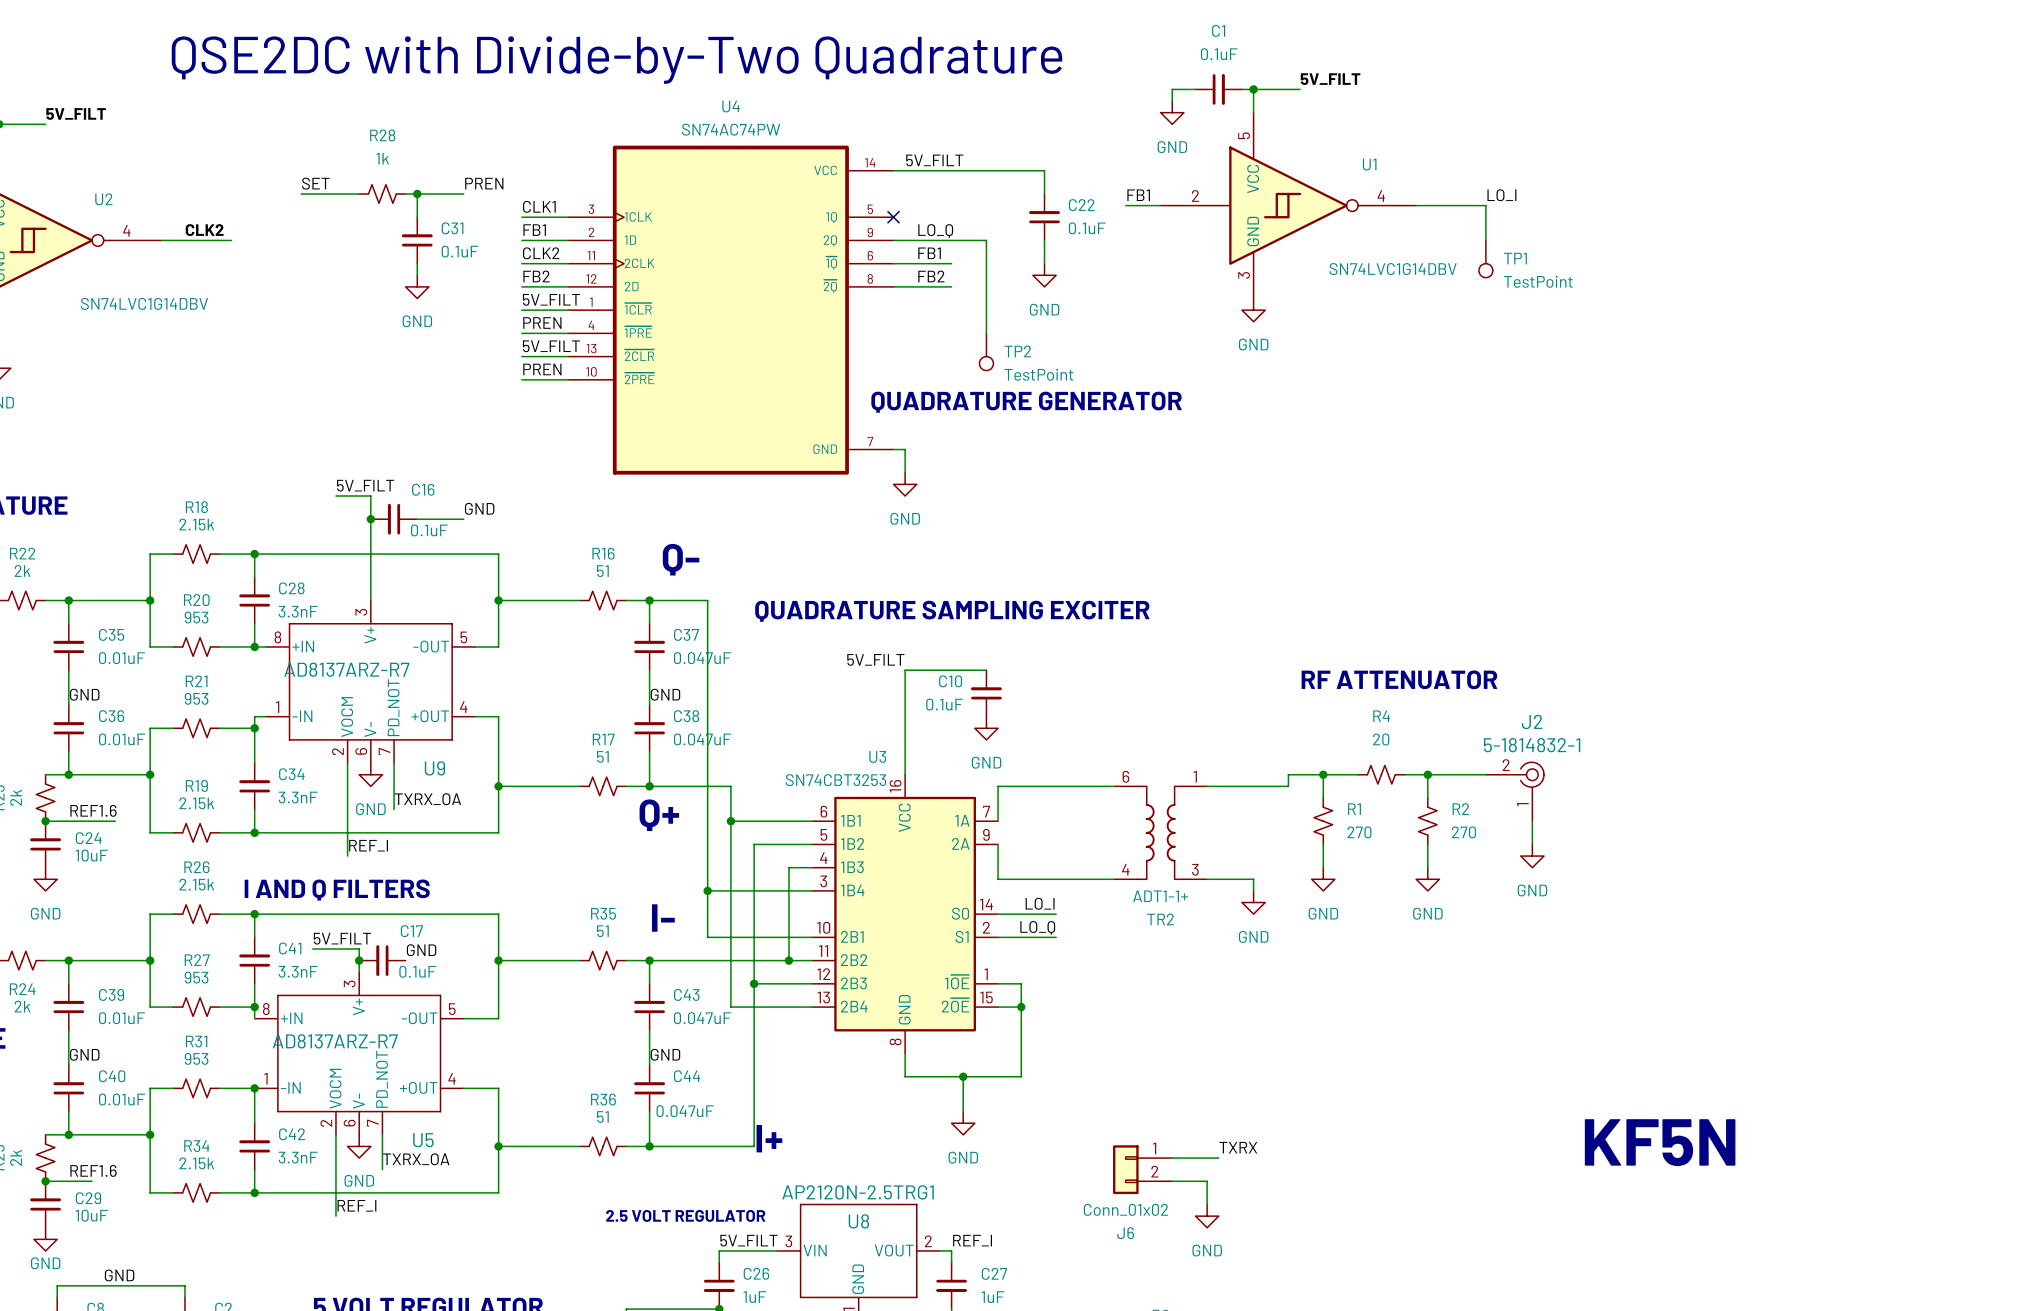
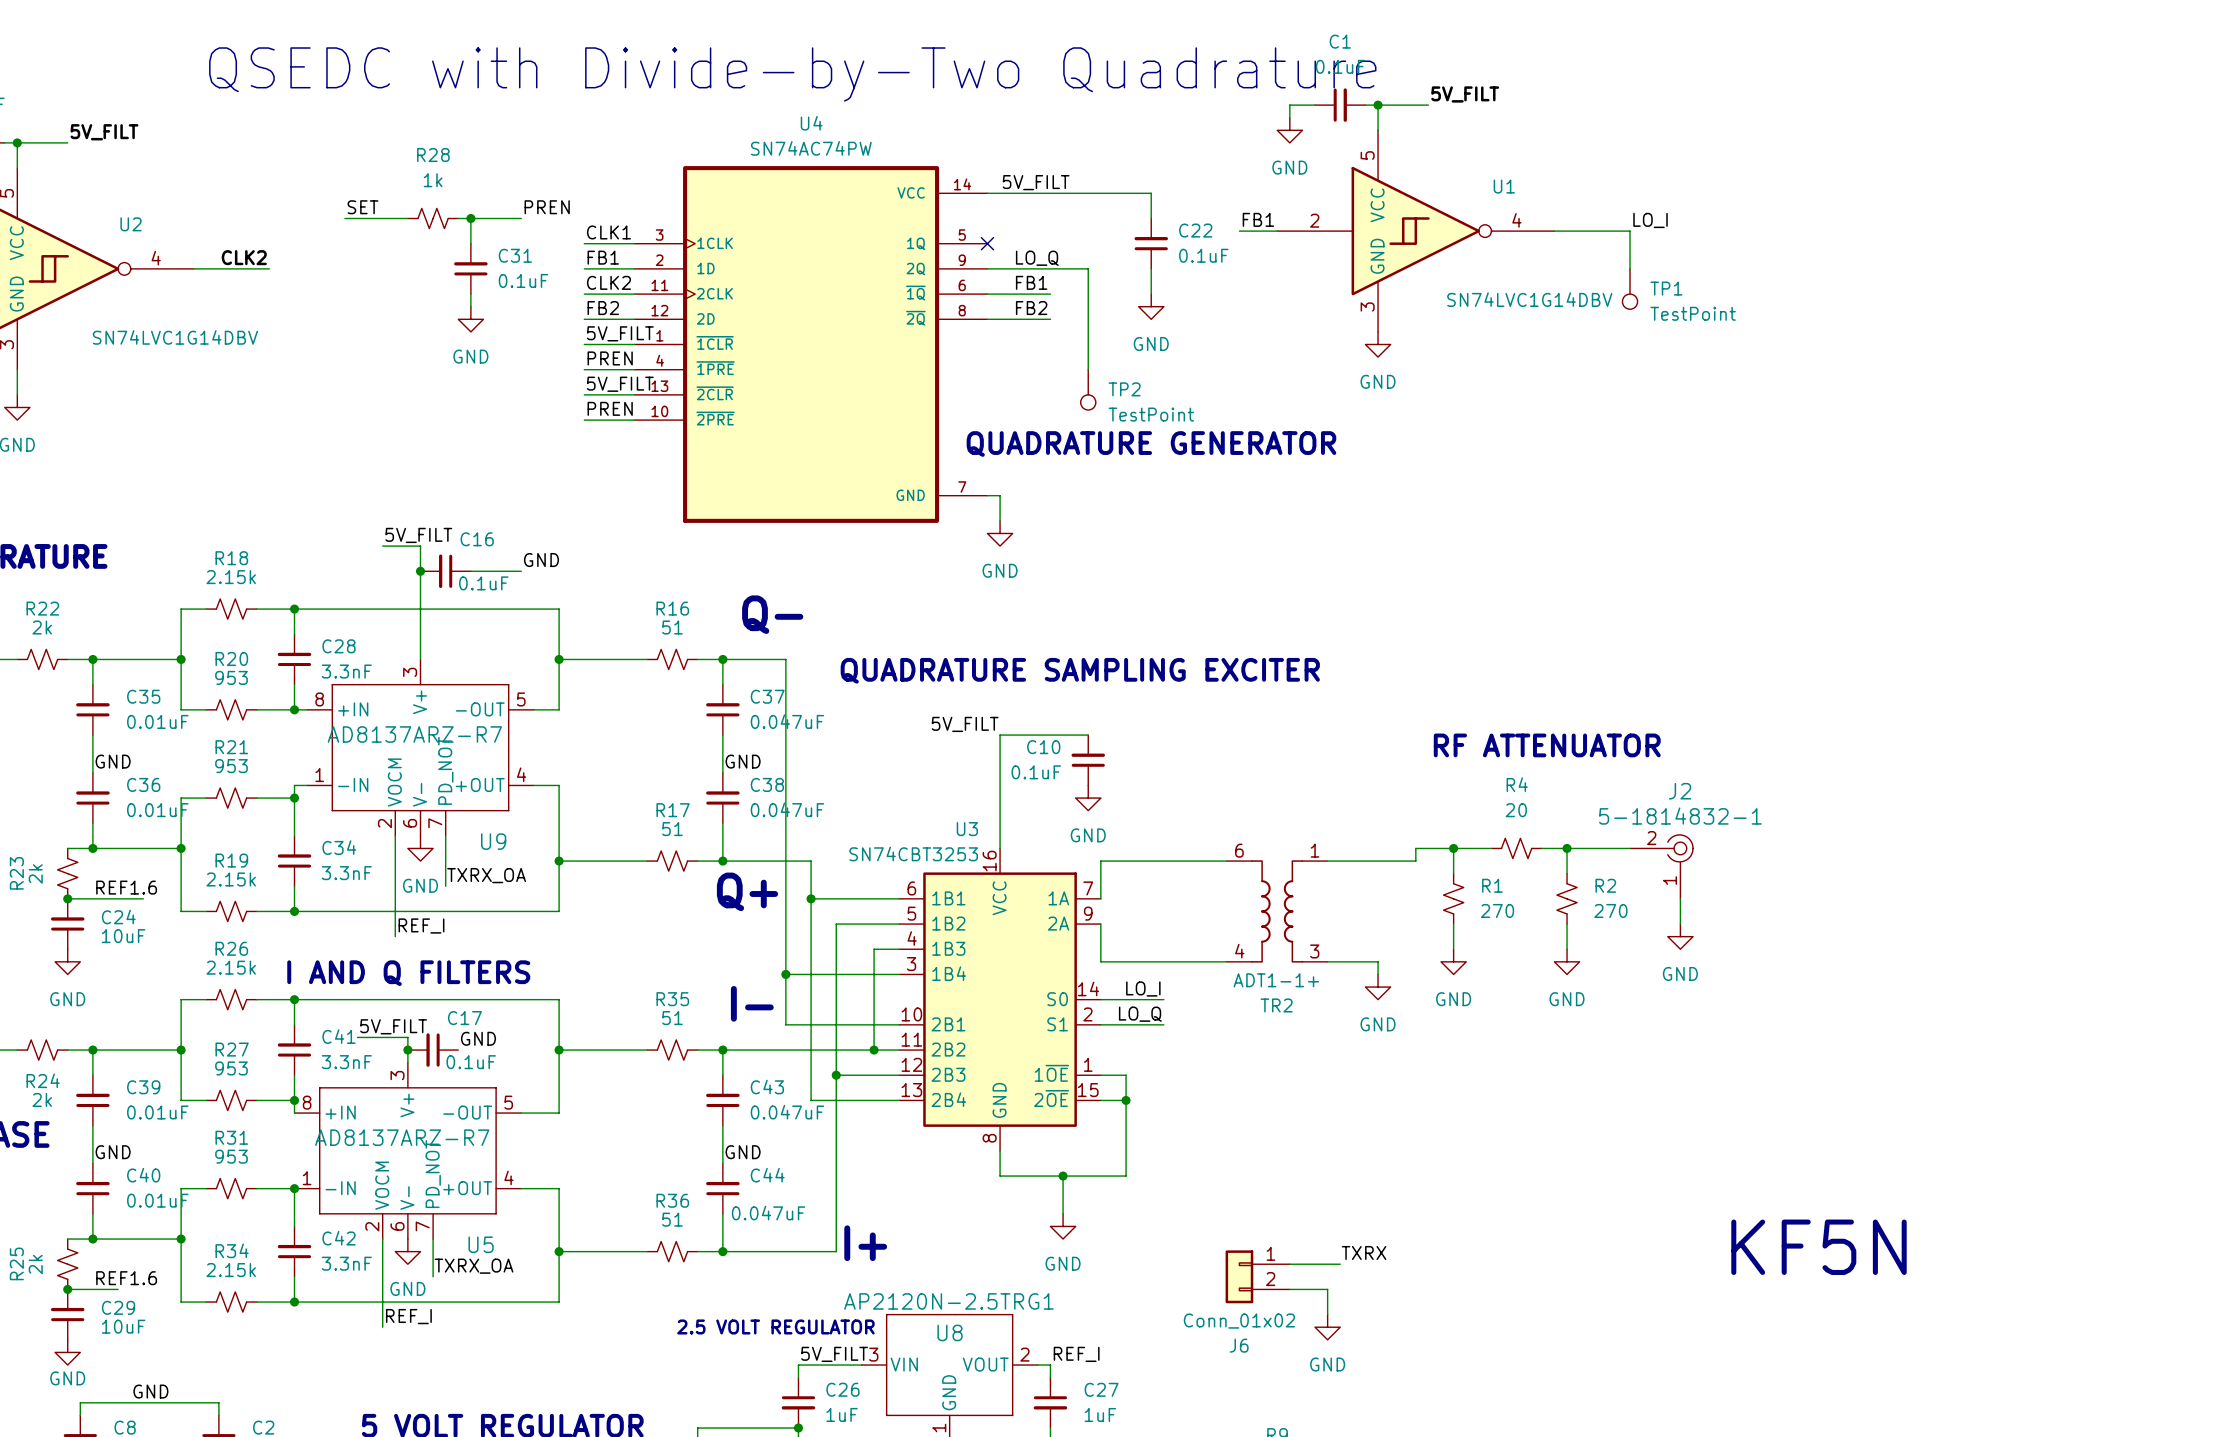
text: QSE2DC with Divide-by-Two Quadrature (616, 60) -> QSEDC with Divide-by-Two Quadrature (792, 74)

